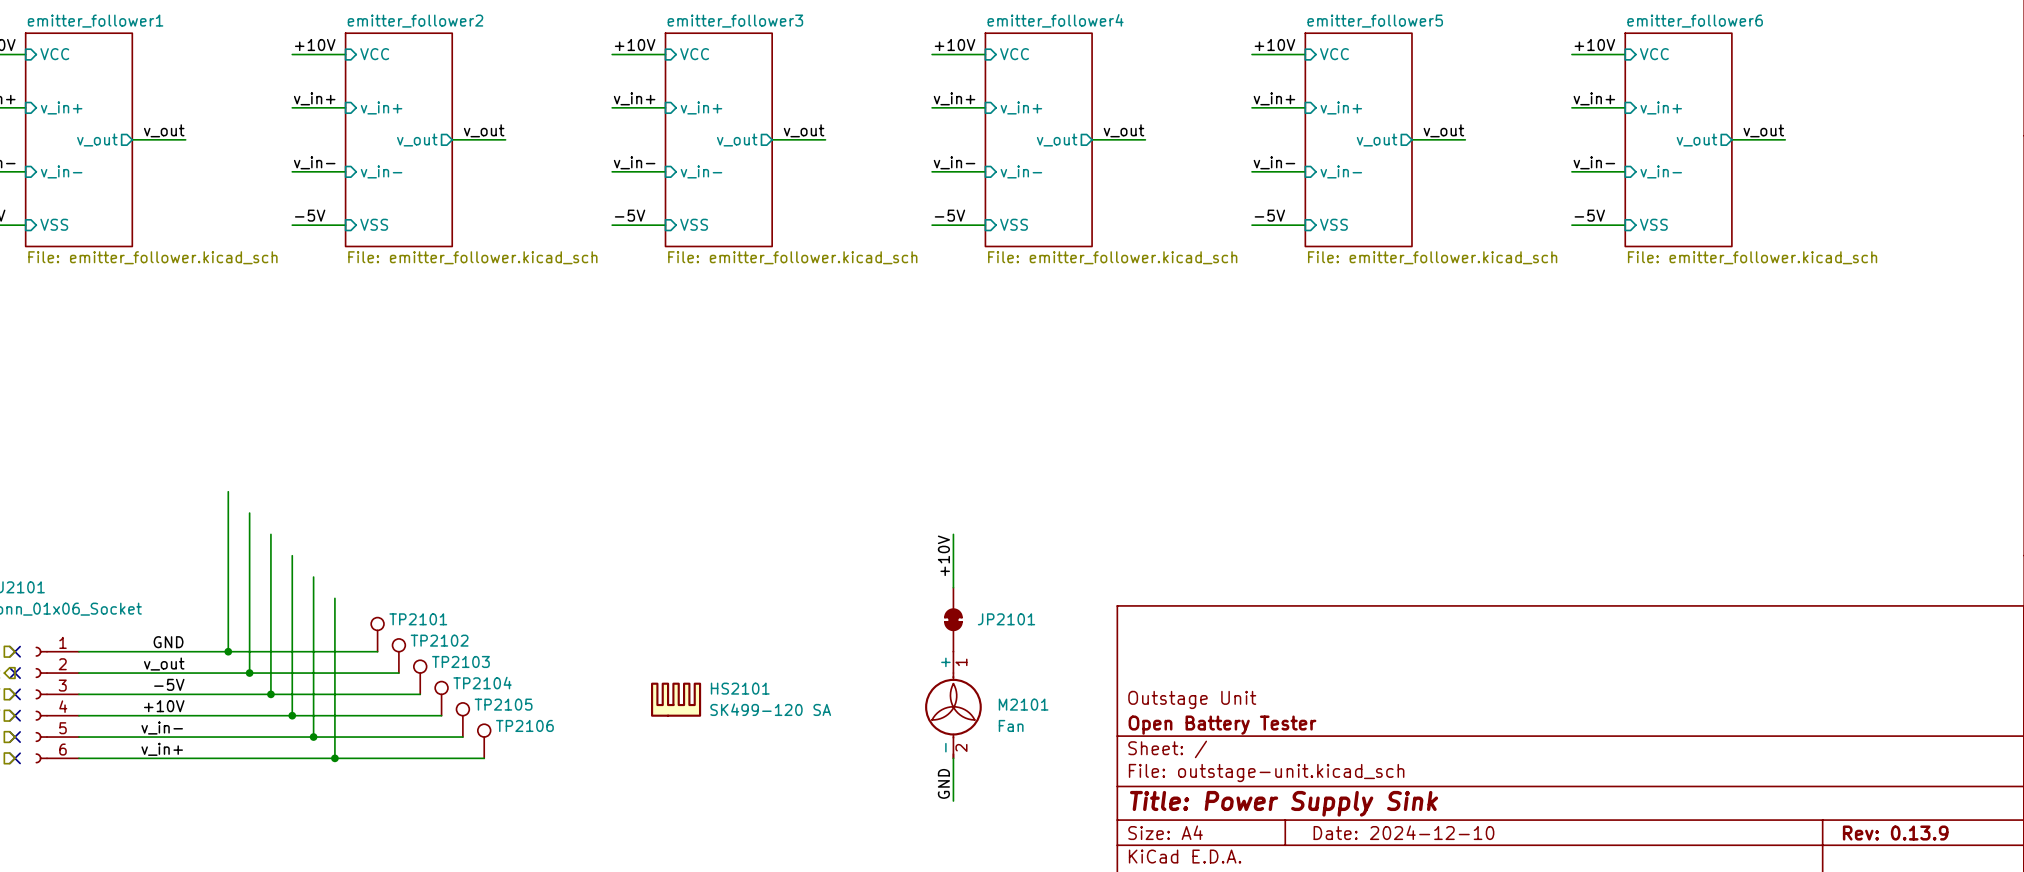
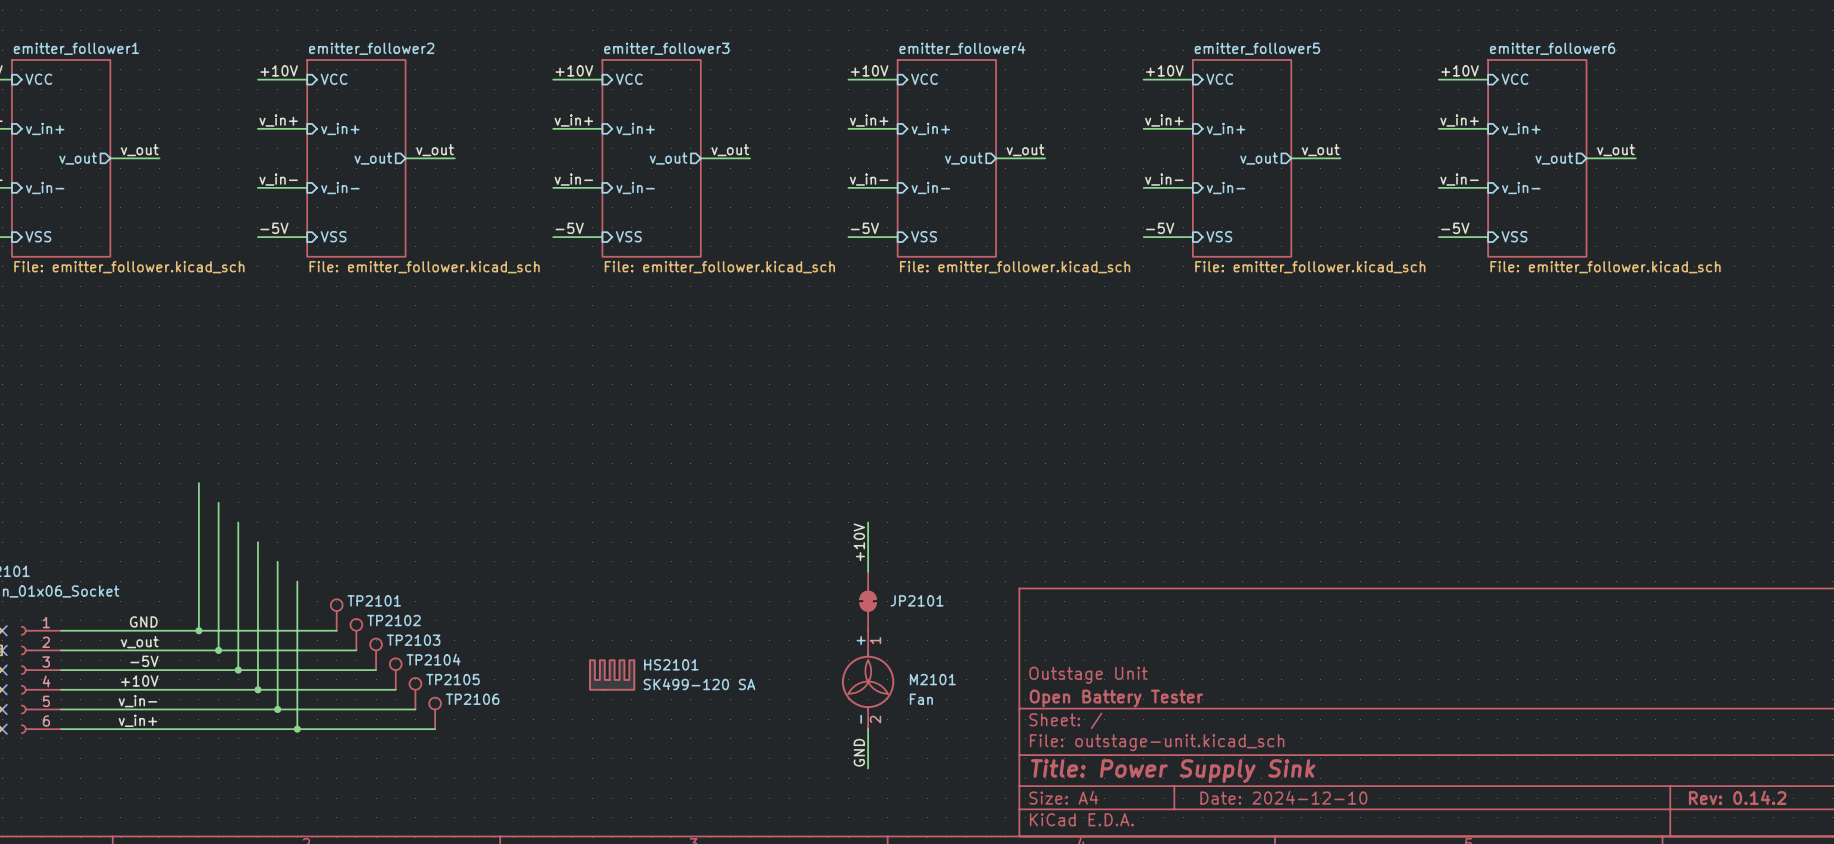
title block: Rev: 0.13.9 (1895, 833) -> Rev: 0.14.2 (1737, 797)

